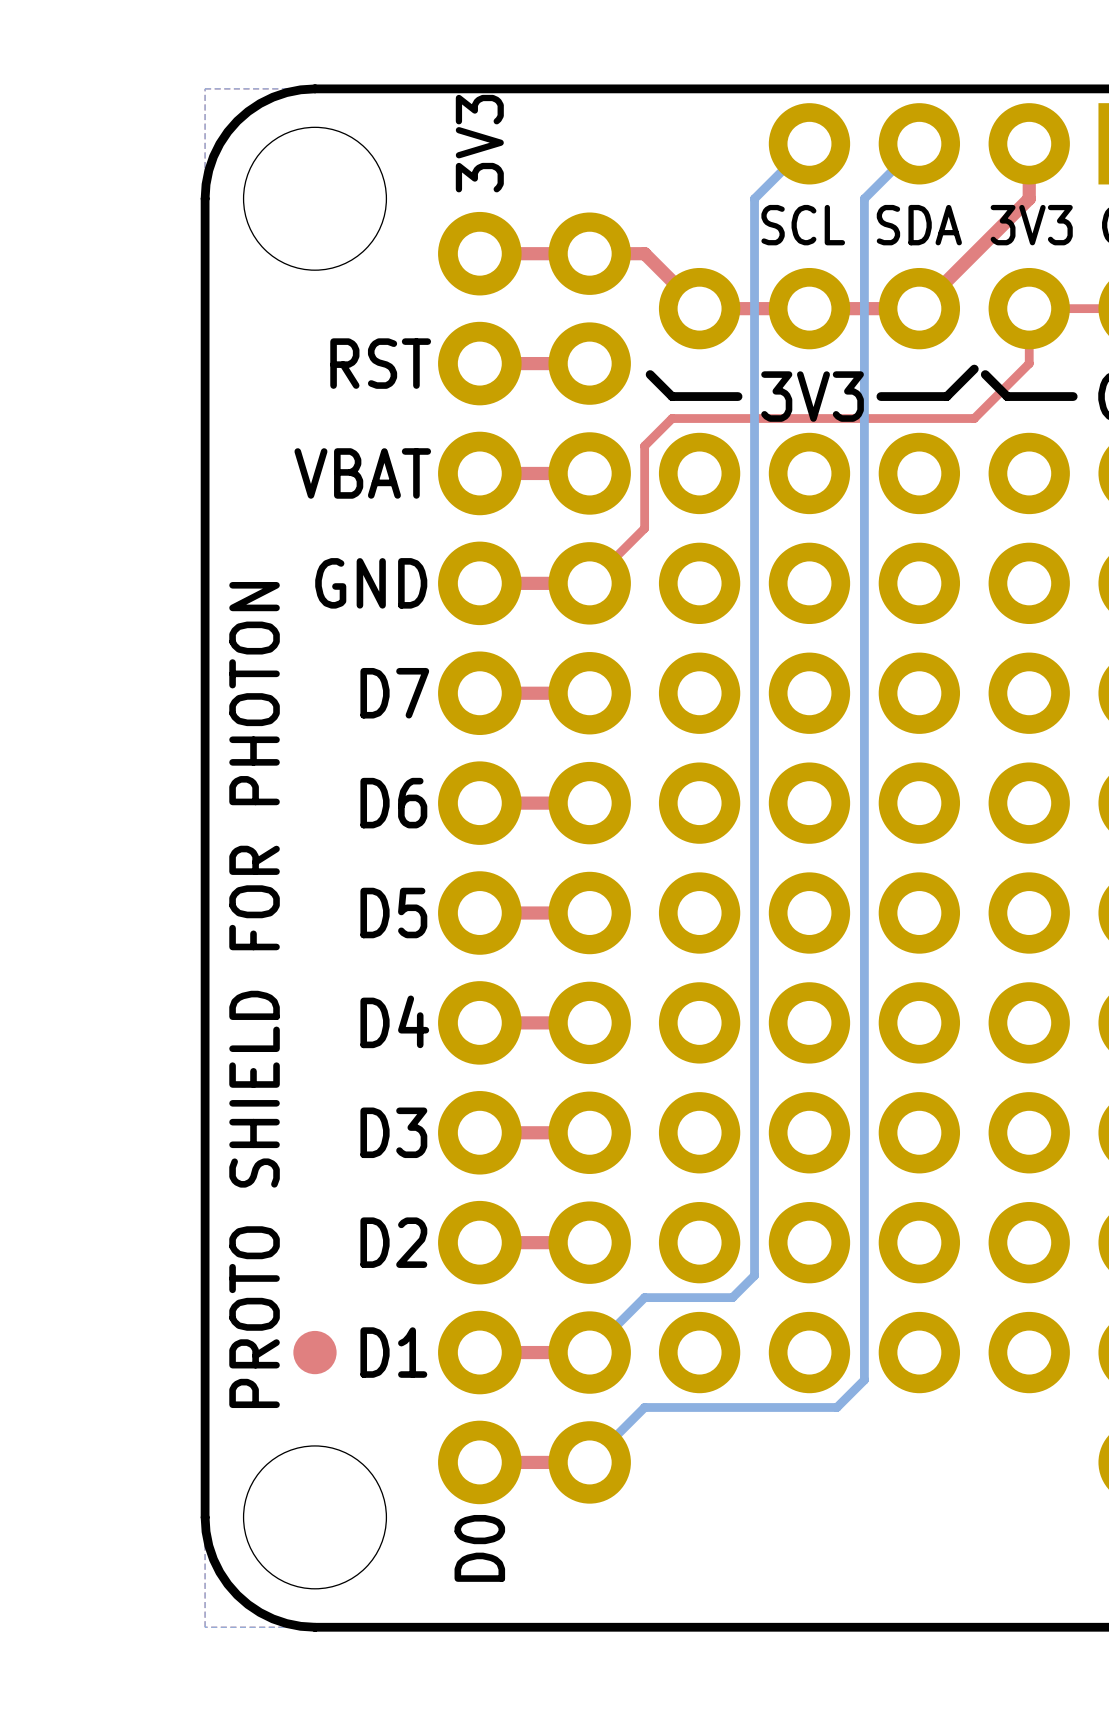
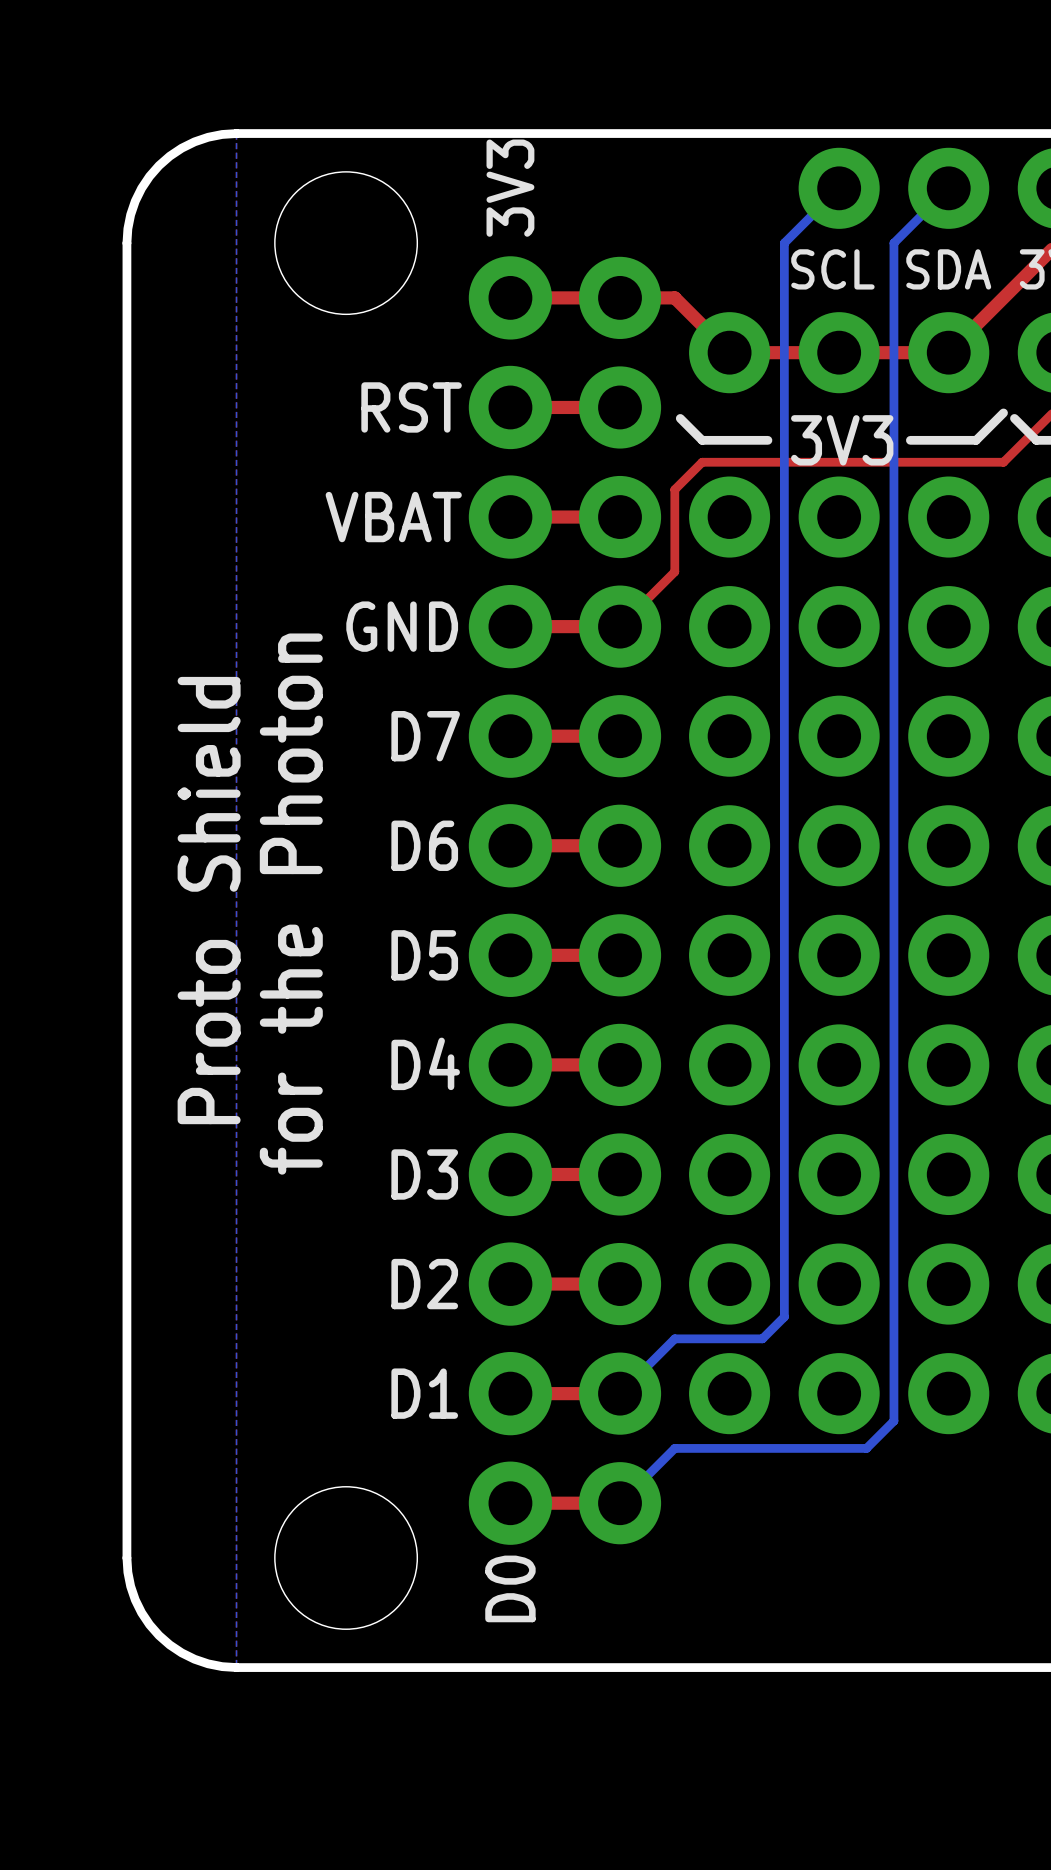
board edge: (314, 88) (286, 92) (272, 97) (248, 111) (237, 121) (227, 131) (213, 156) (208, 170) (205, 198) (206, 1531) (213, 1559) (227, 1584) (237, 1595) (248, 1604) (272, 1618) (286, 1623) (314, 1627) -> (346, 133) (222, 134) (208, 137) (181, 148) (159, 165) (141, 188) (130, 214) (126, 243) (127, 1572) (135, 1599) (149, 1624) (169, 1644) (194, 1659) (208, 1663) (236, 1667) (346, 1667)
text: none -> Proto Shield (209, 900)
text: none -> for the Photon (291, 904)
text: PROTO SHIELD FOR PHOTON (254, 995) -> none
part: (314, 1352) -> none

